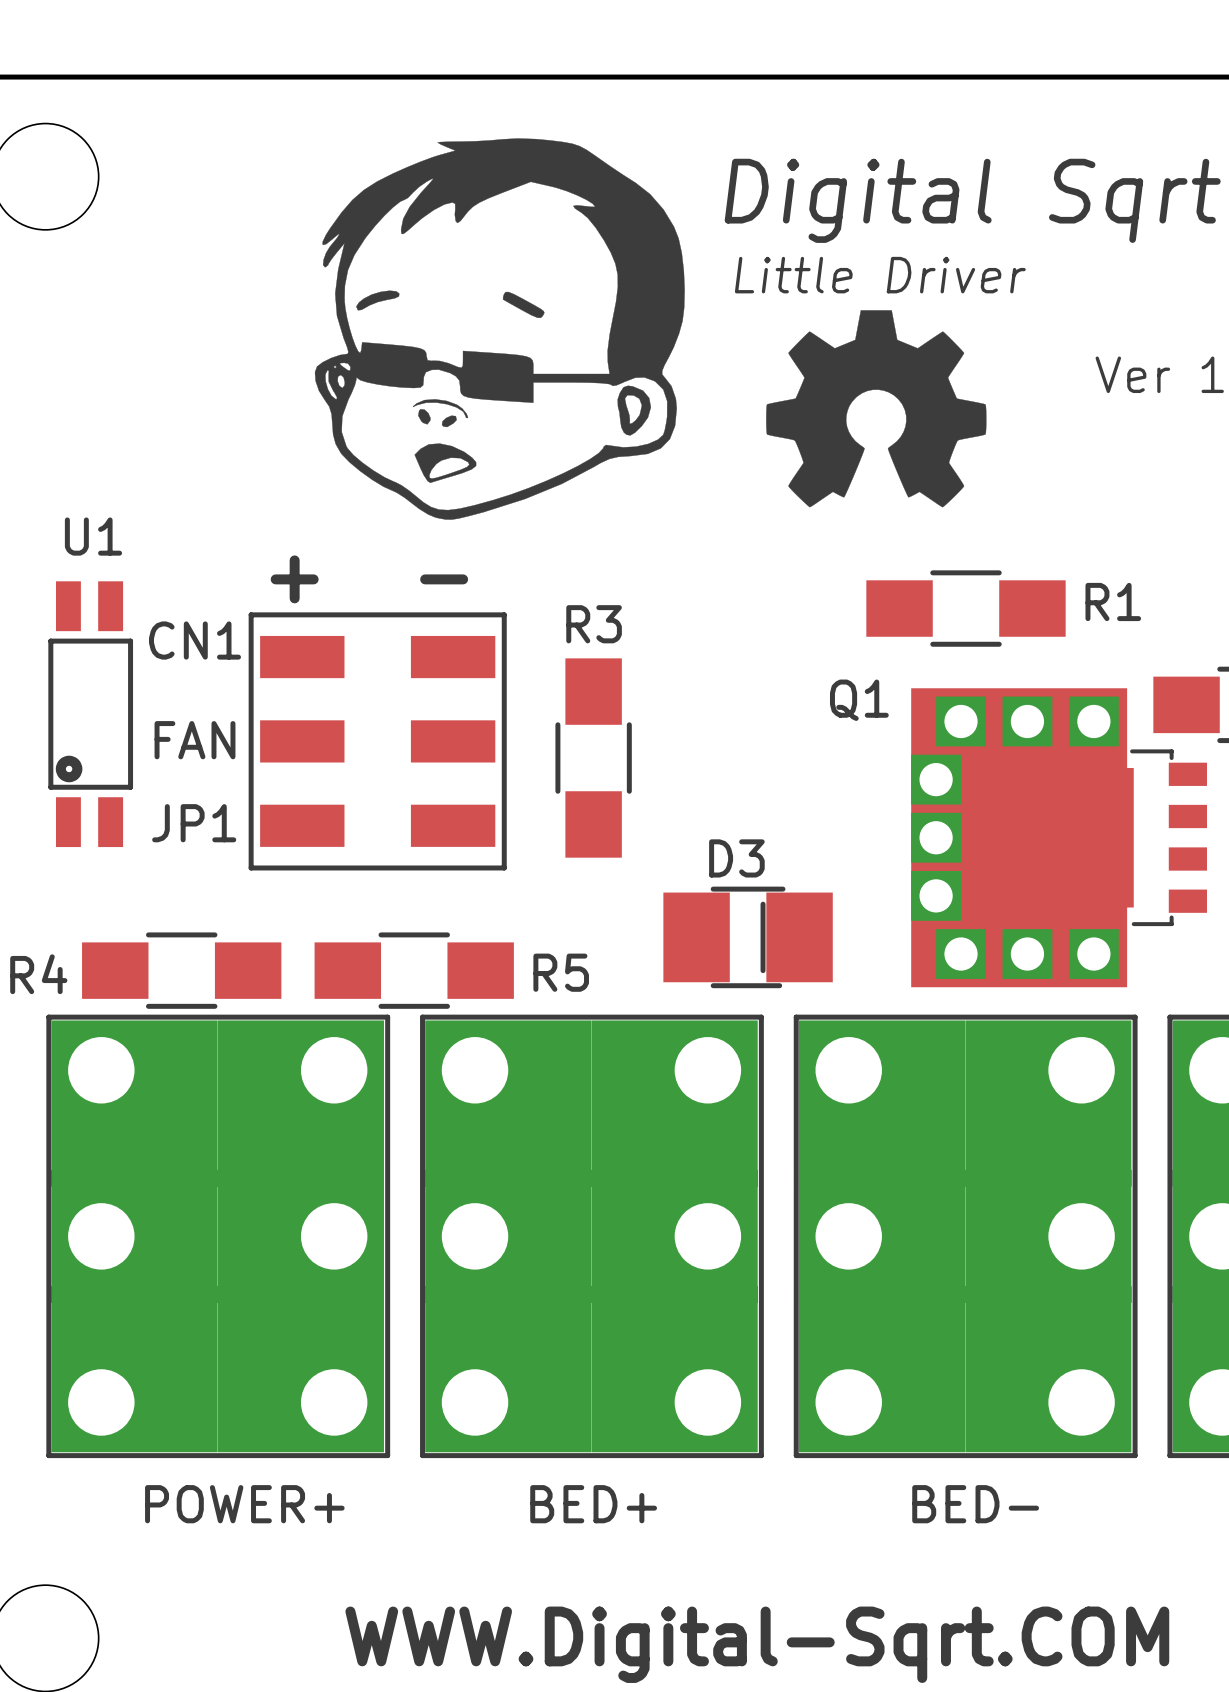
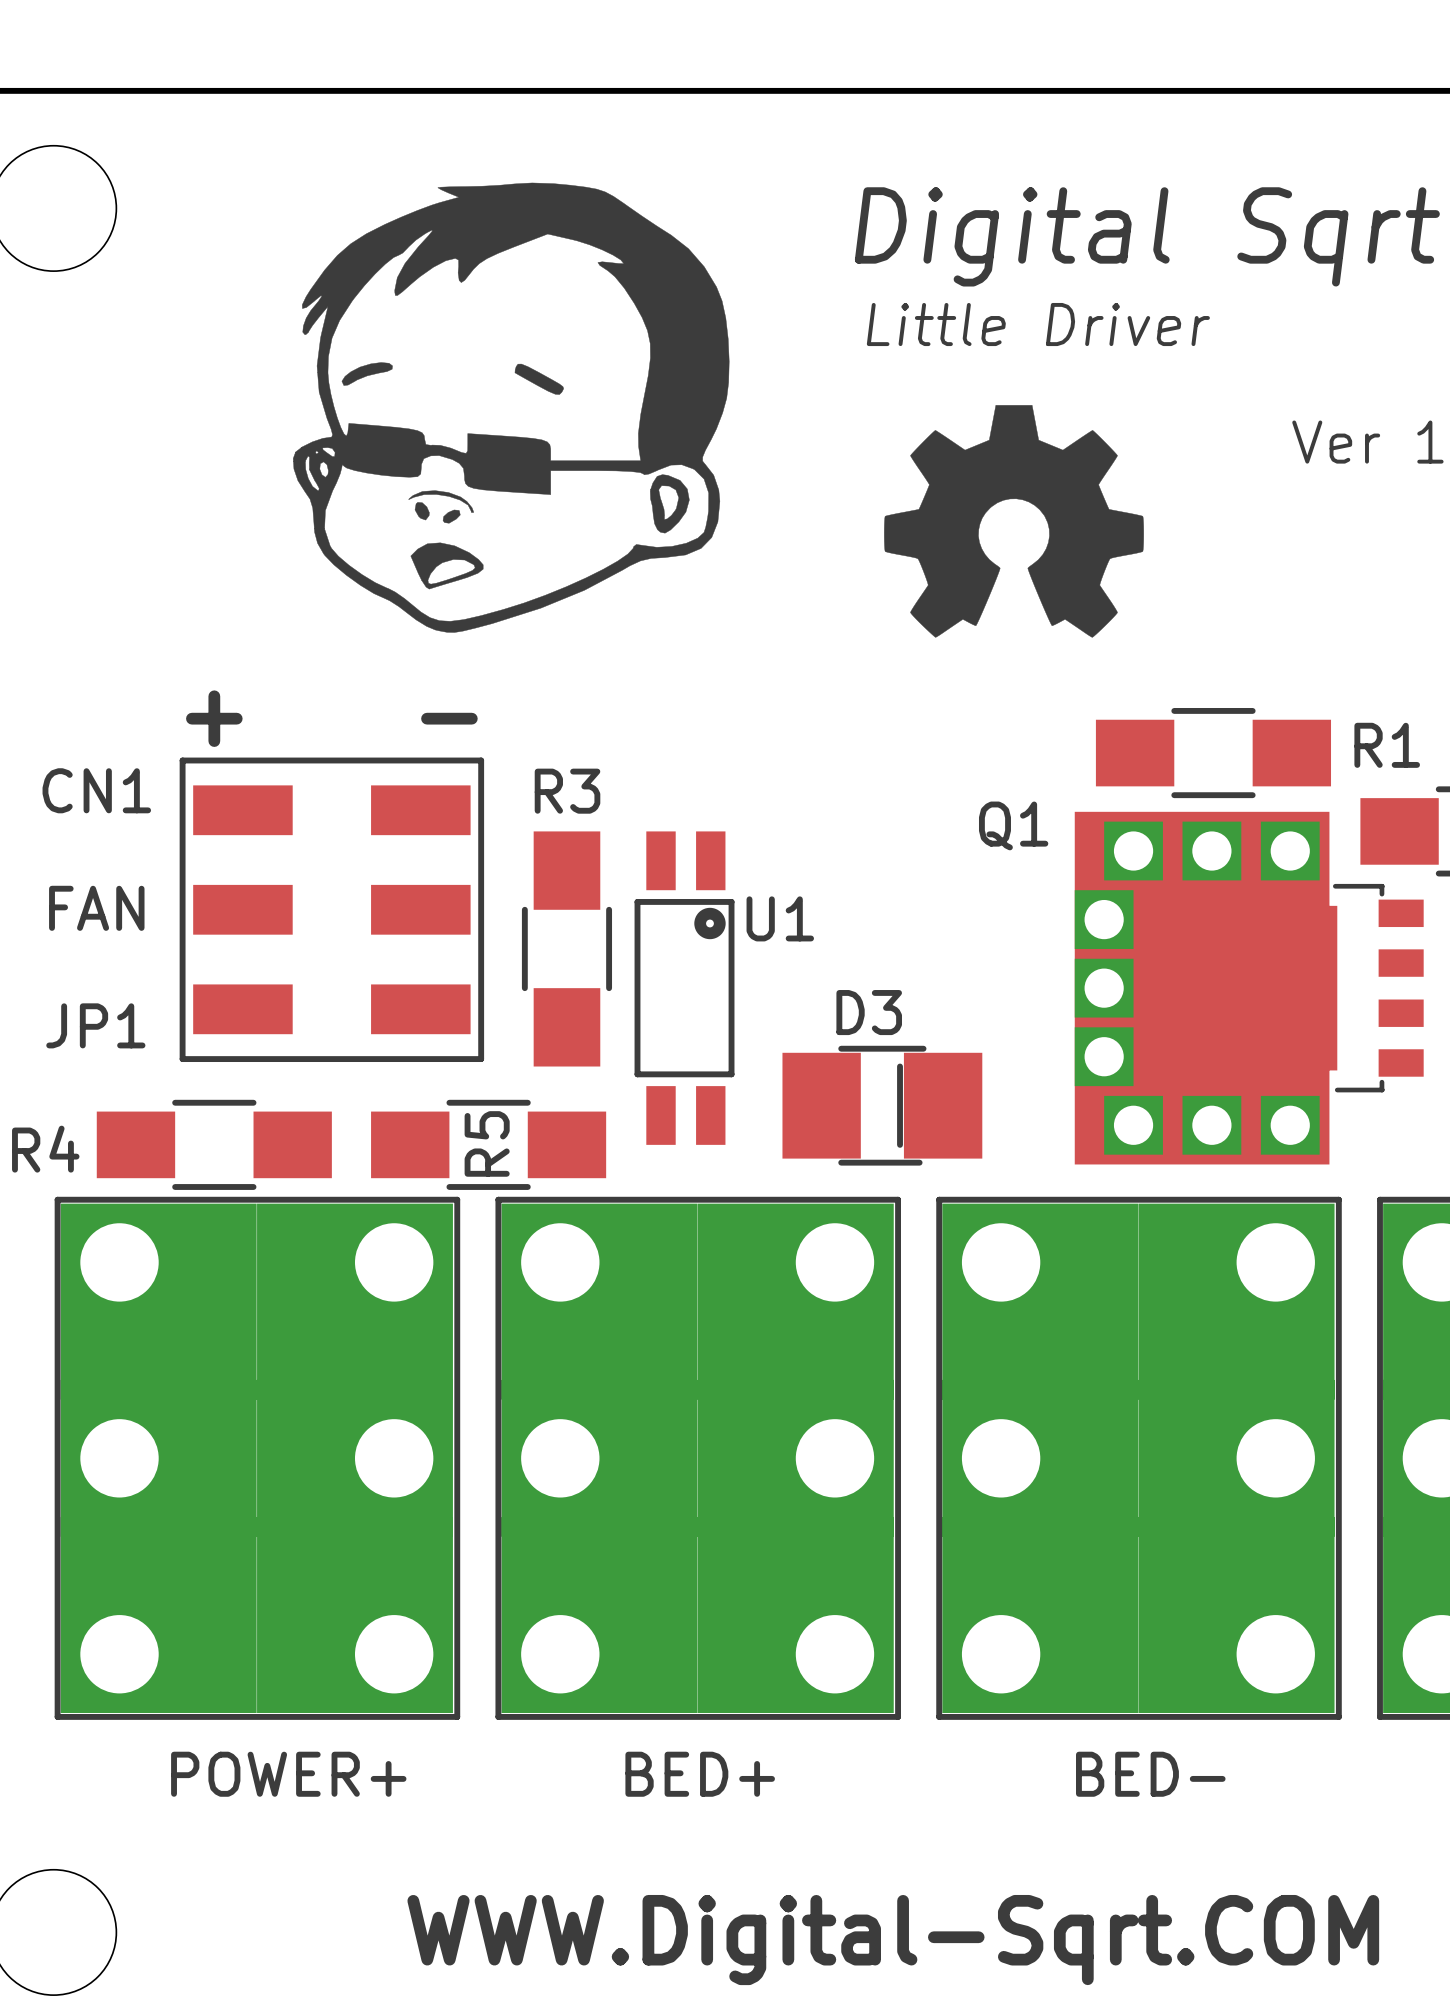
drawing position: (499, 329) -> (511, 407)
drawing position: (876, 408) -> (1014, 521)
U1 name position: U1 (93, 536) -> U1 (780, 918)
text position: + (294, 579) -> + (214, 718)
text position: - (444, 579) -> - (449, 718)
R1 position: (965, 608) -> (1213, 753)
CN1 name position: CN1 (195, 640) -> CN1 (96, 790)
U1 rotation: 0° (90, 714) -> 180° (684, 988)
U1 position: (90, 714) -> (684, 988)
text position: FAN (195, 740) -> FAN (96, 908)
CN1 position: (377, 741) -> (331, 909)
R3 position: (593, 758) -> (566, 948)
text position: JP1 (194, 823) -> JP1 (95, 1025)
R5 name rotation: 0° (561, 972) -> 90° counterclockwise (487, 1143)
R5 name position: R5 (561, 972) -> R5 (487, 1143)

